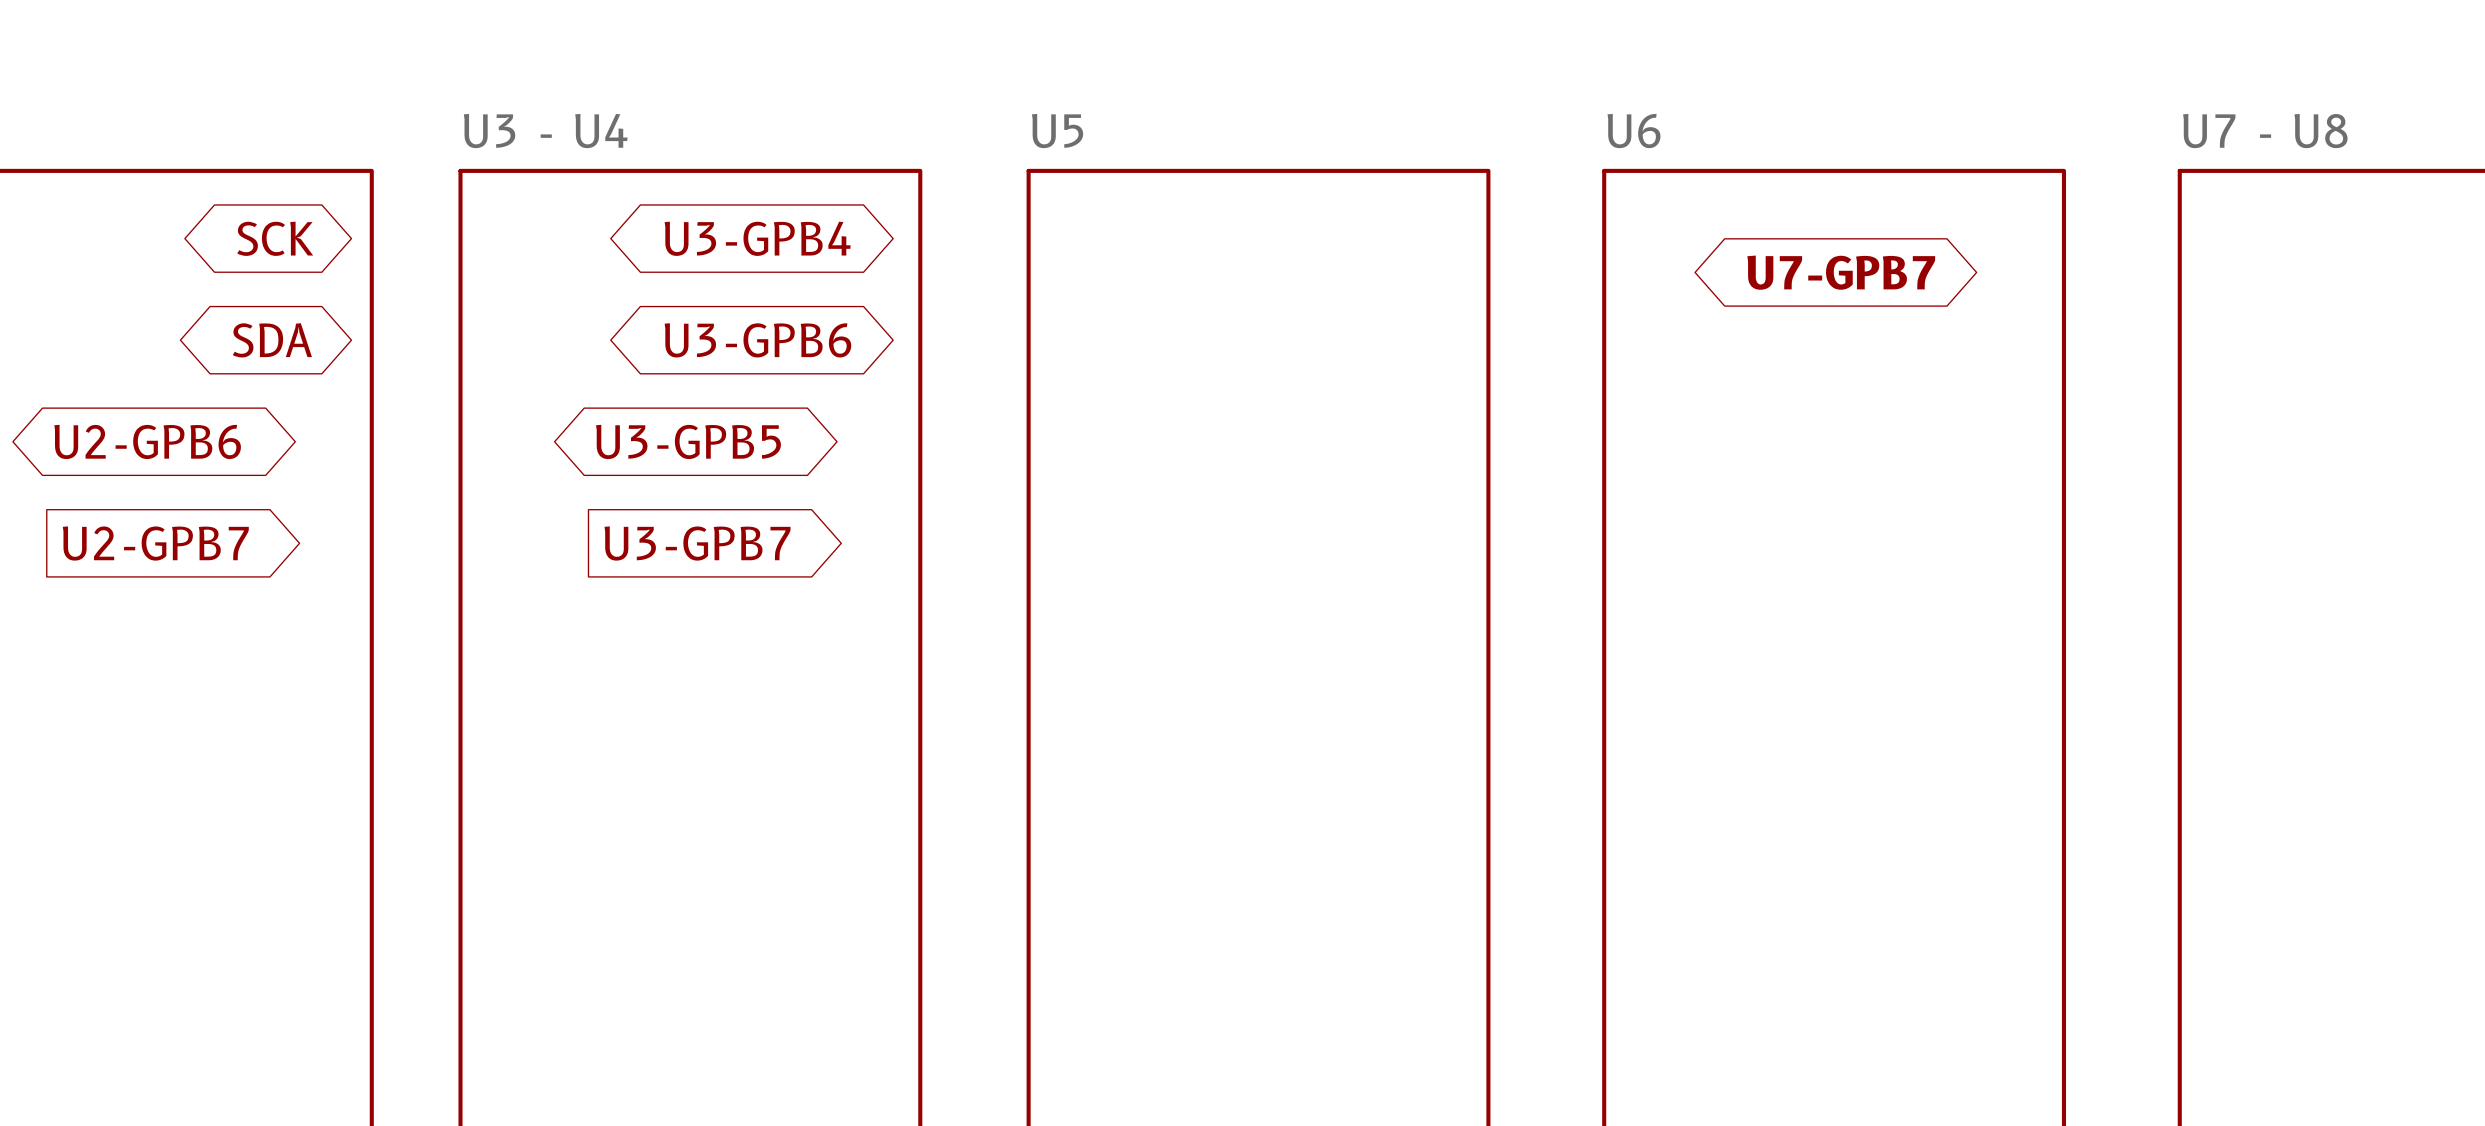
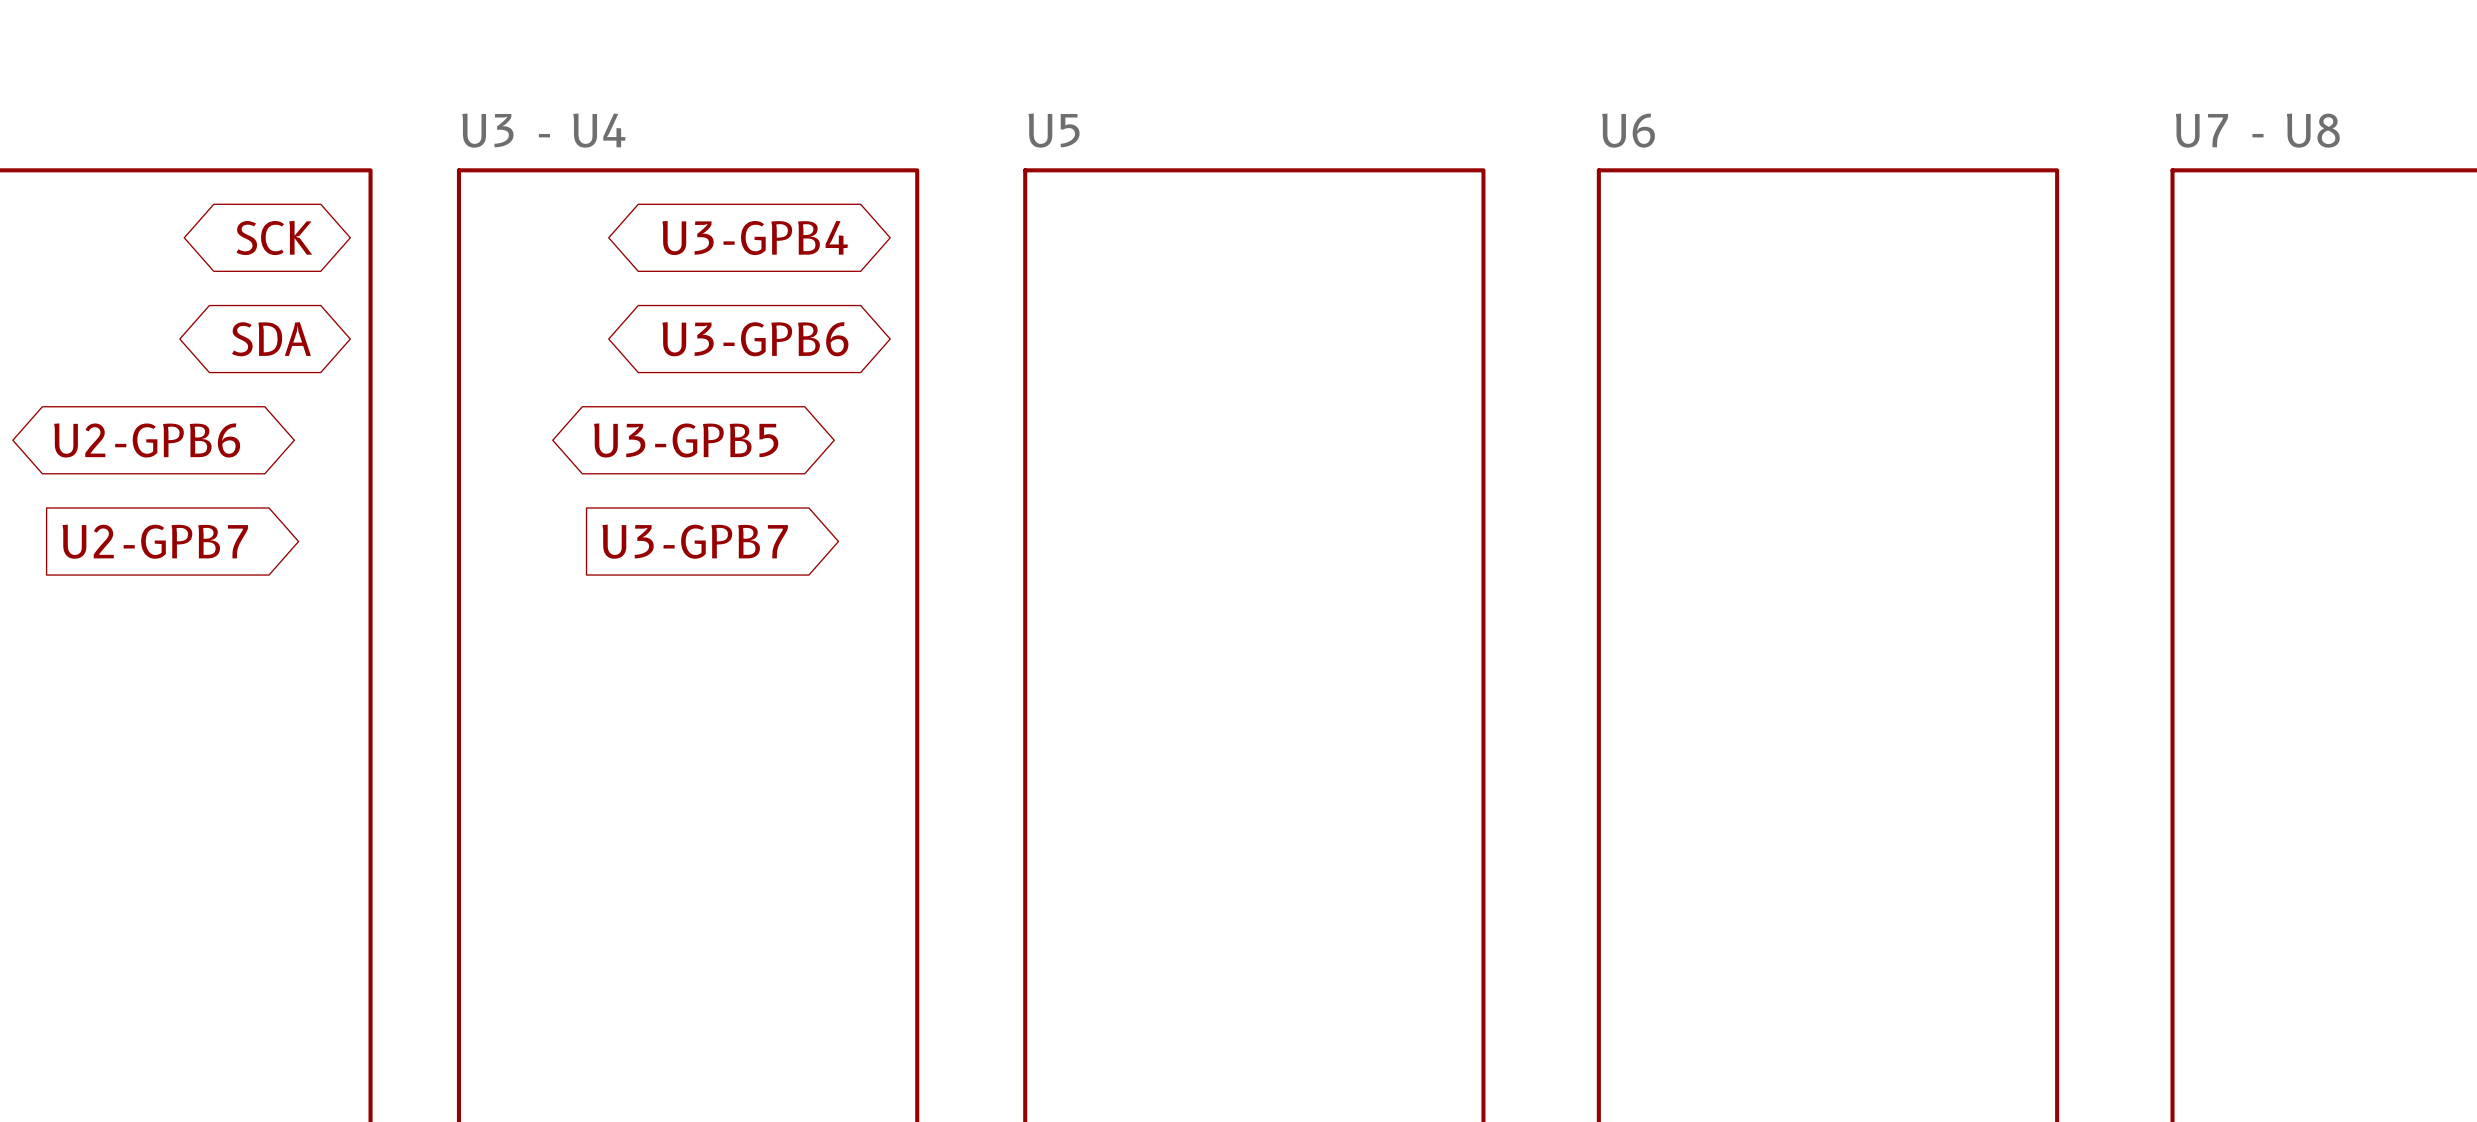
global label: U7-GPB7 (1841, 272) -> none

